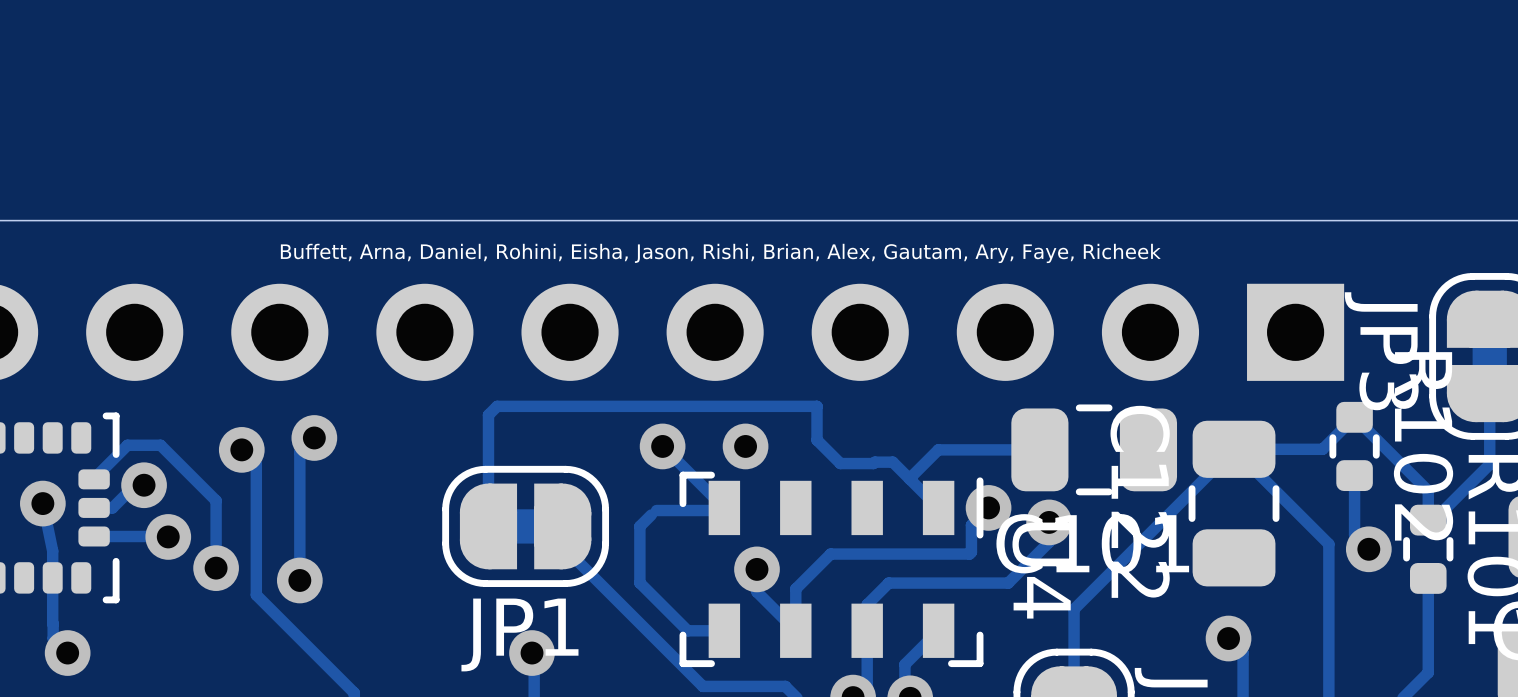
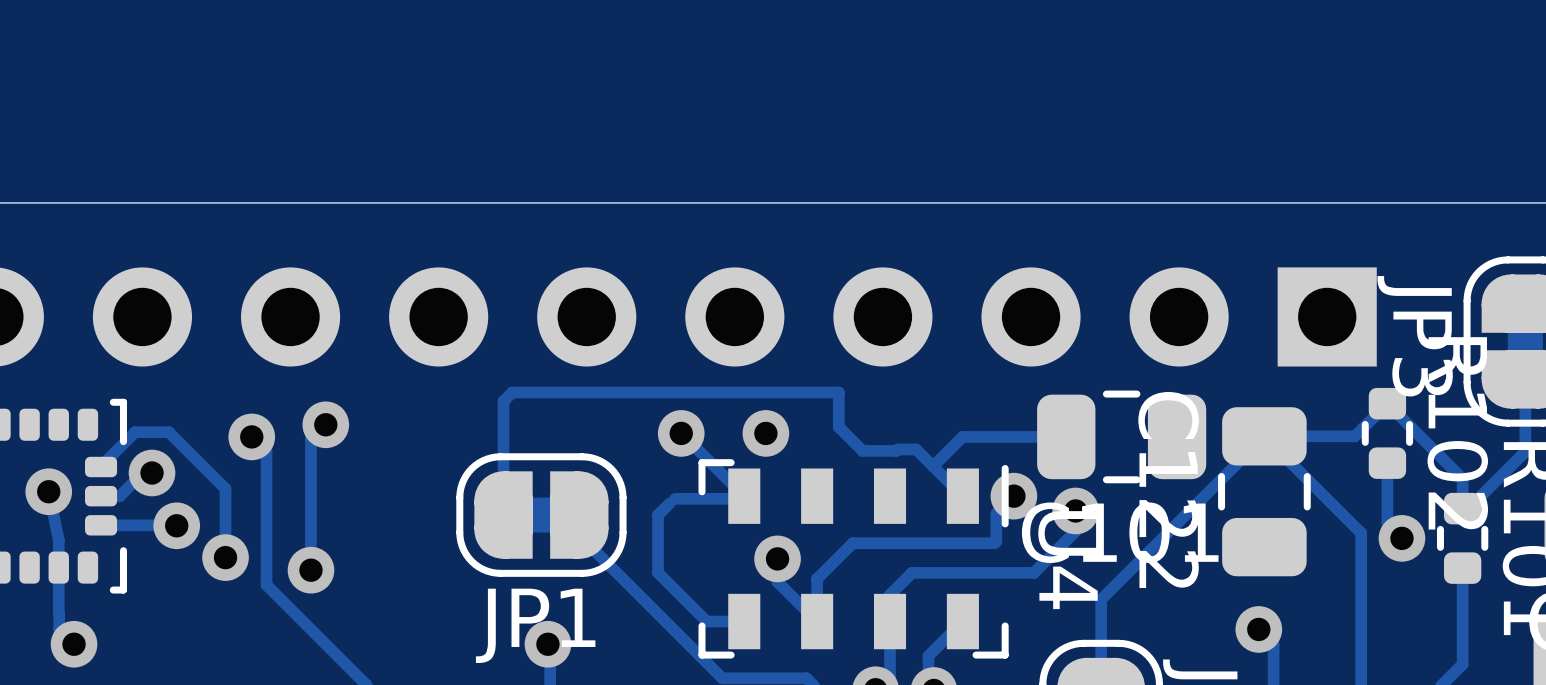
text: Buffett, Arna, Daniel, Rohini, Eisha, Jason, Rishi, Brian, Alex, Gautam, Ary, Faye, Richeek (720, 253) -> none

